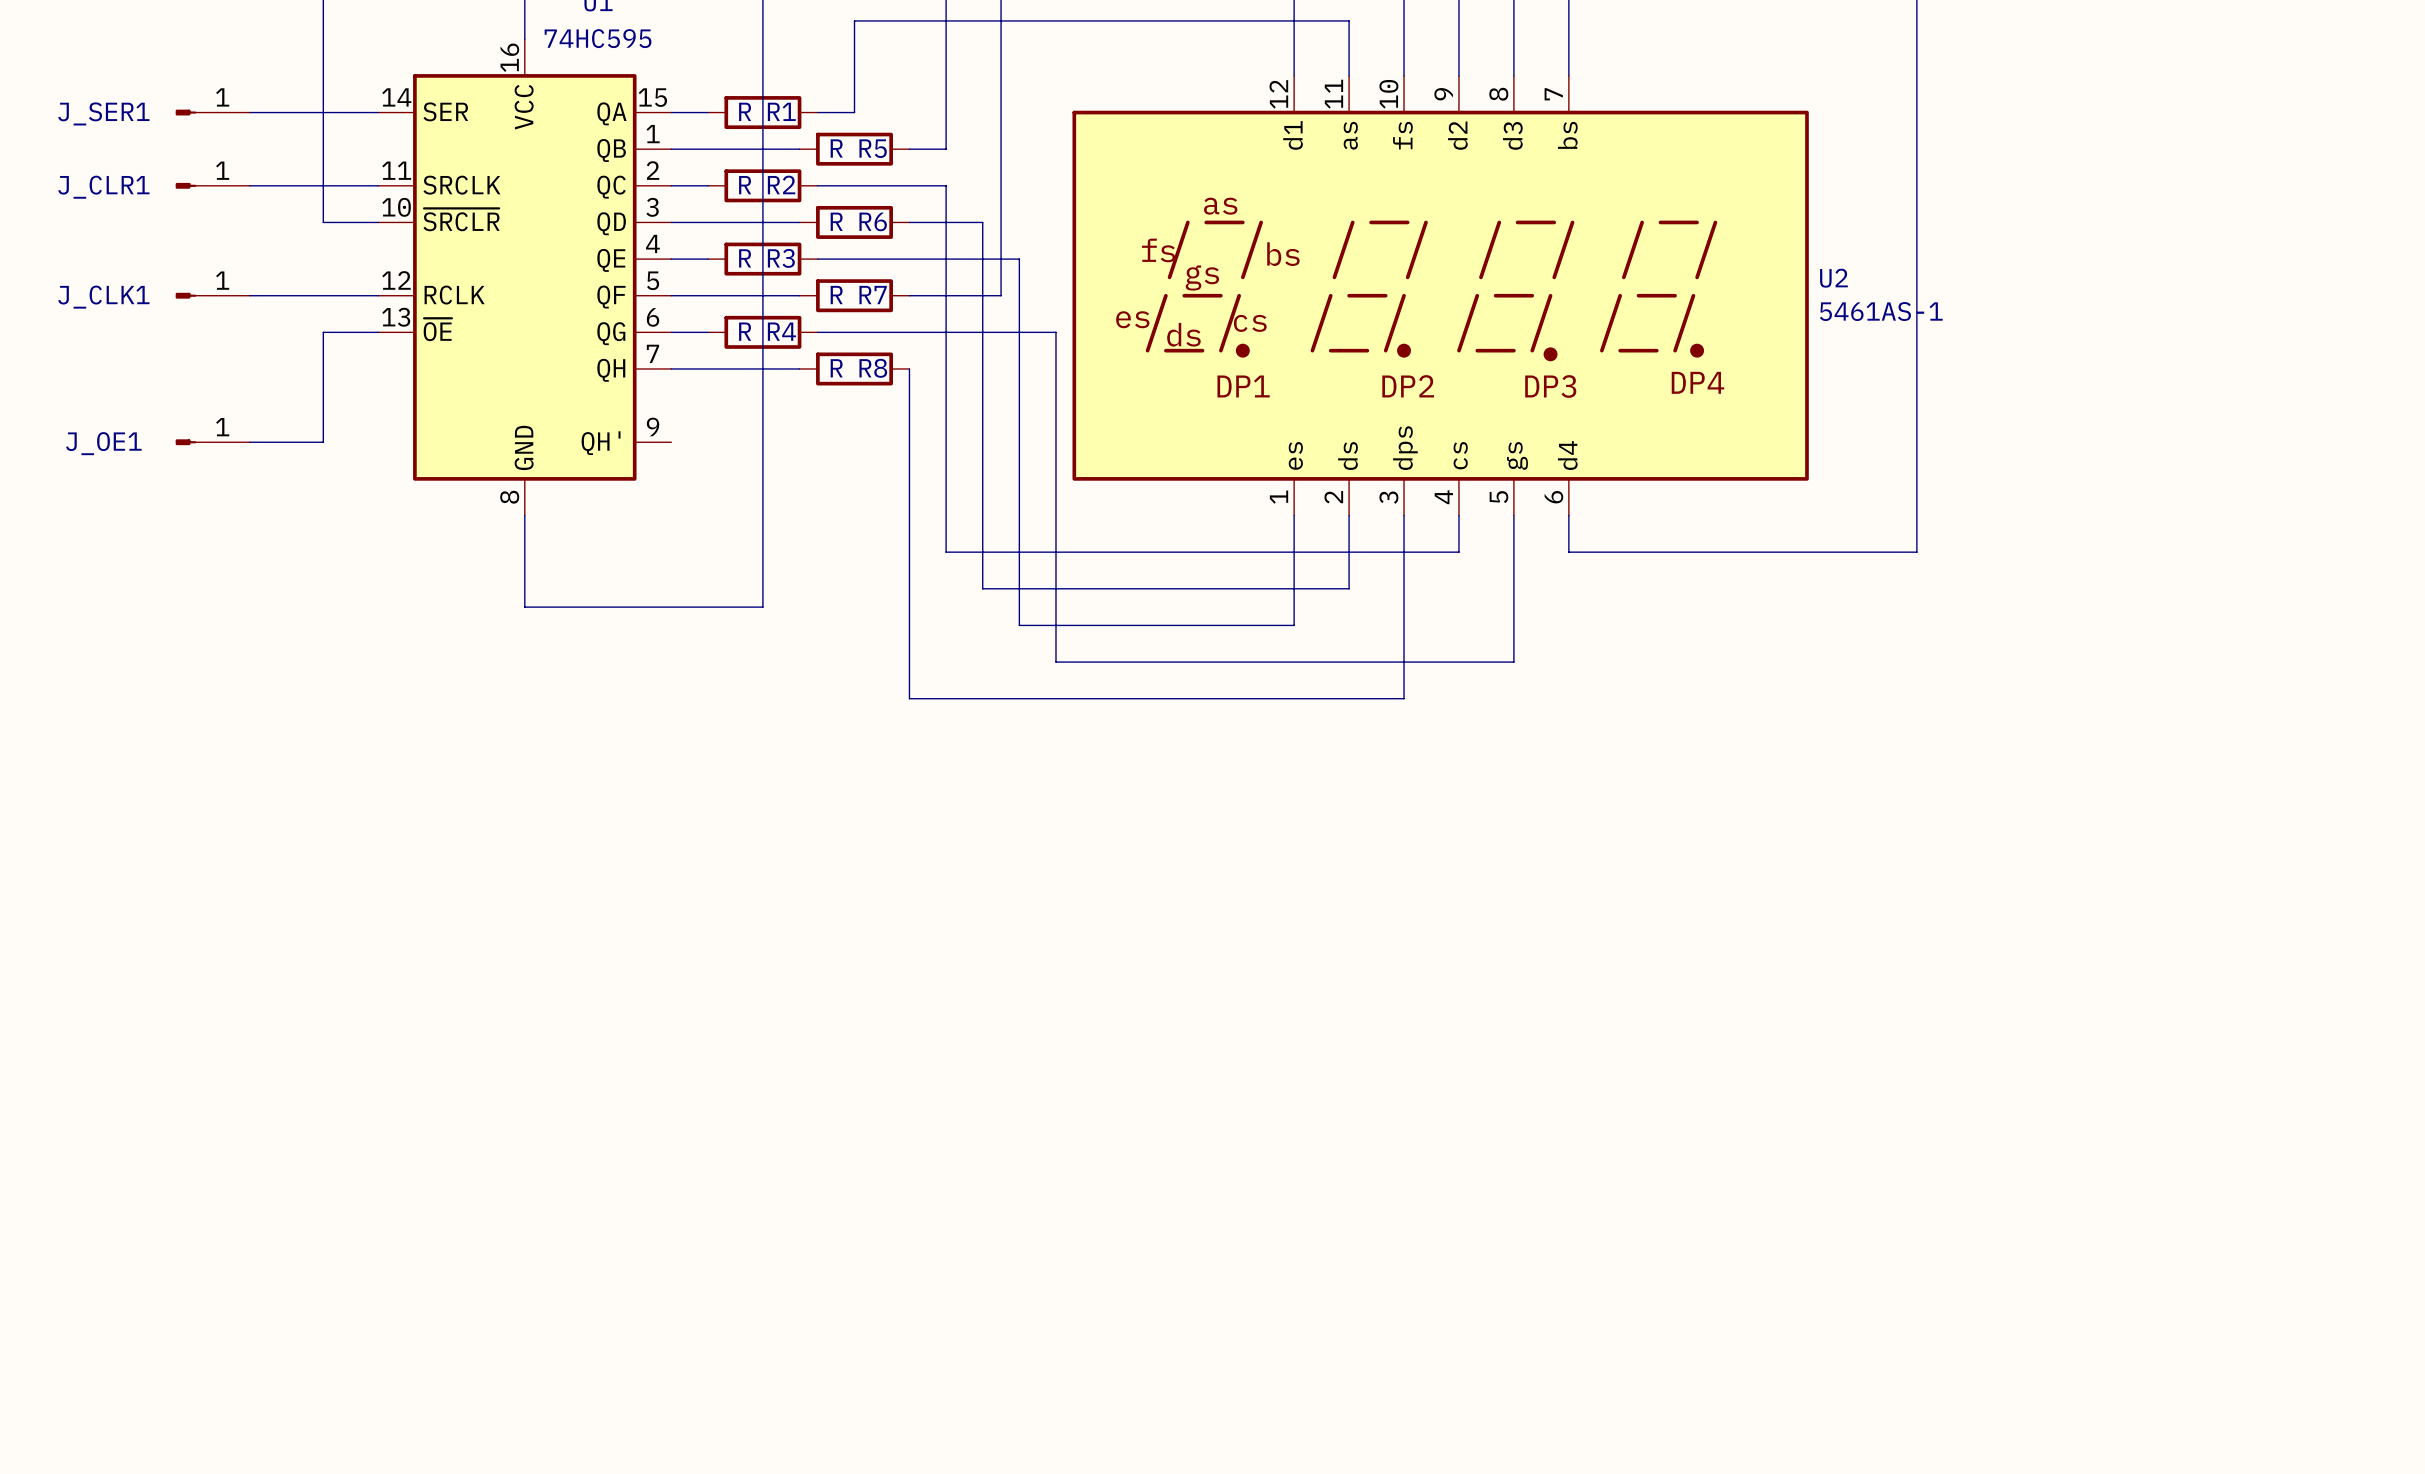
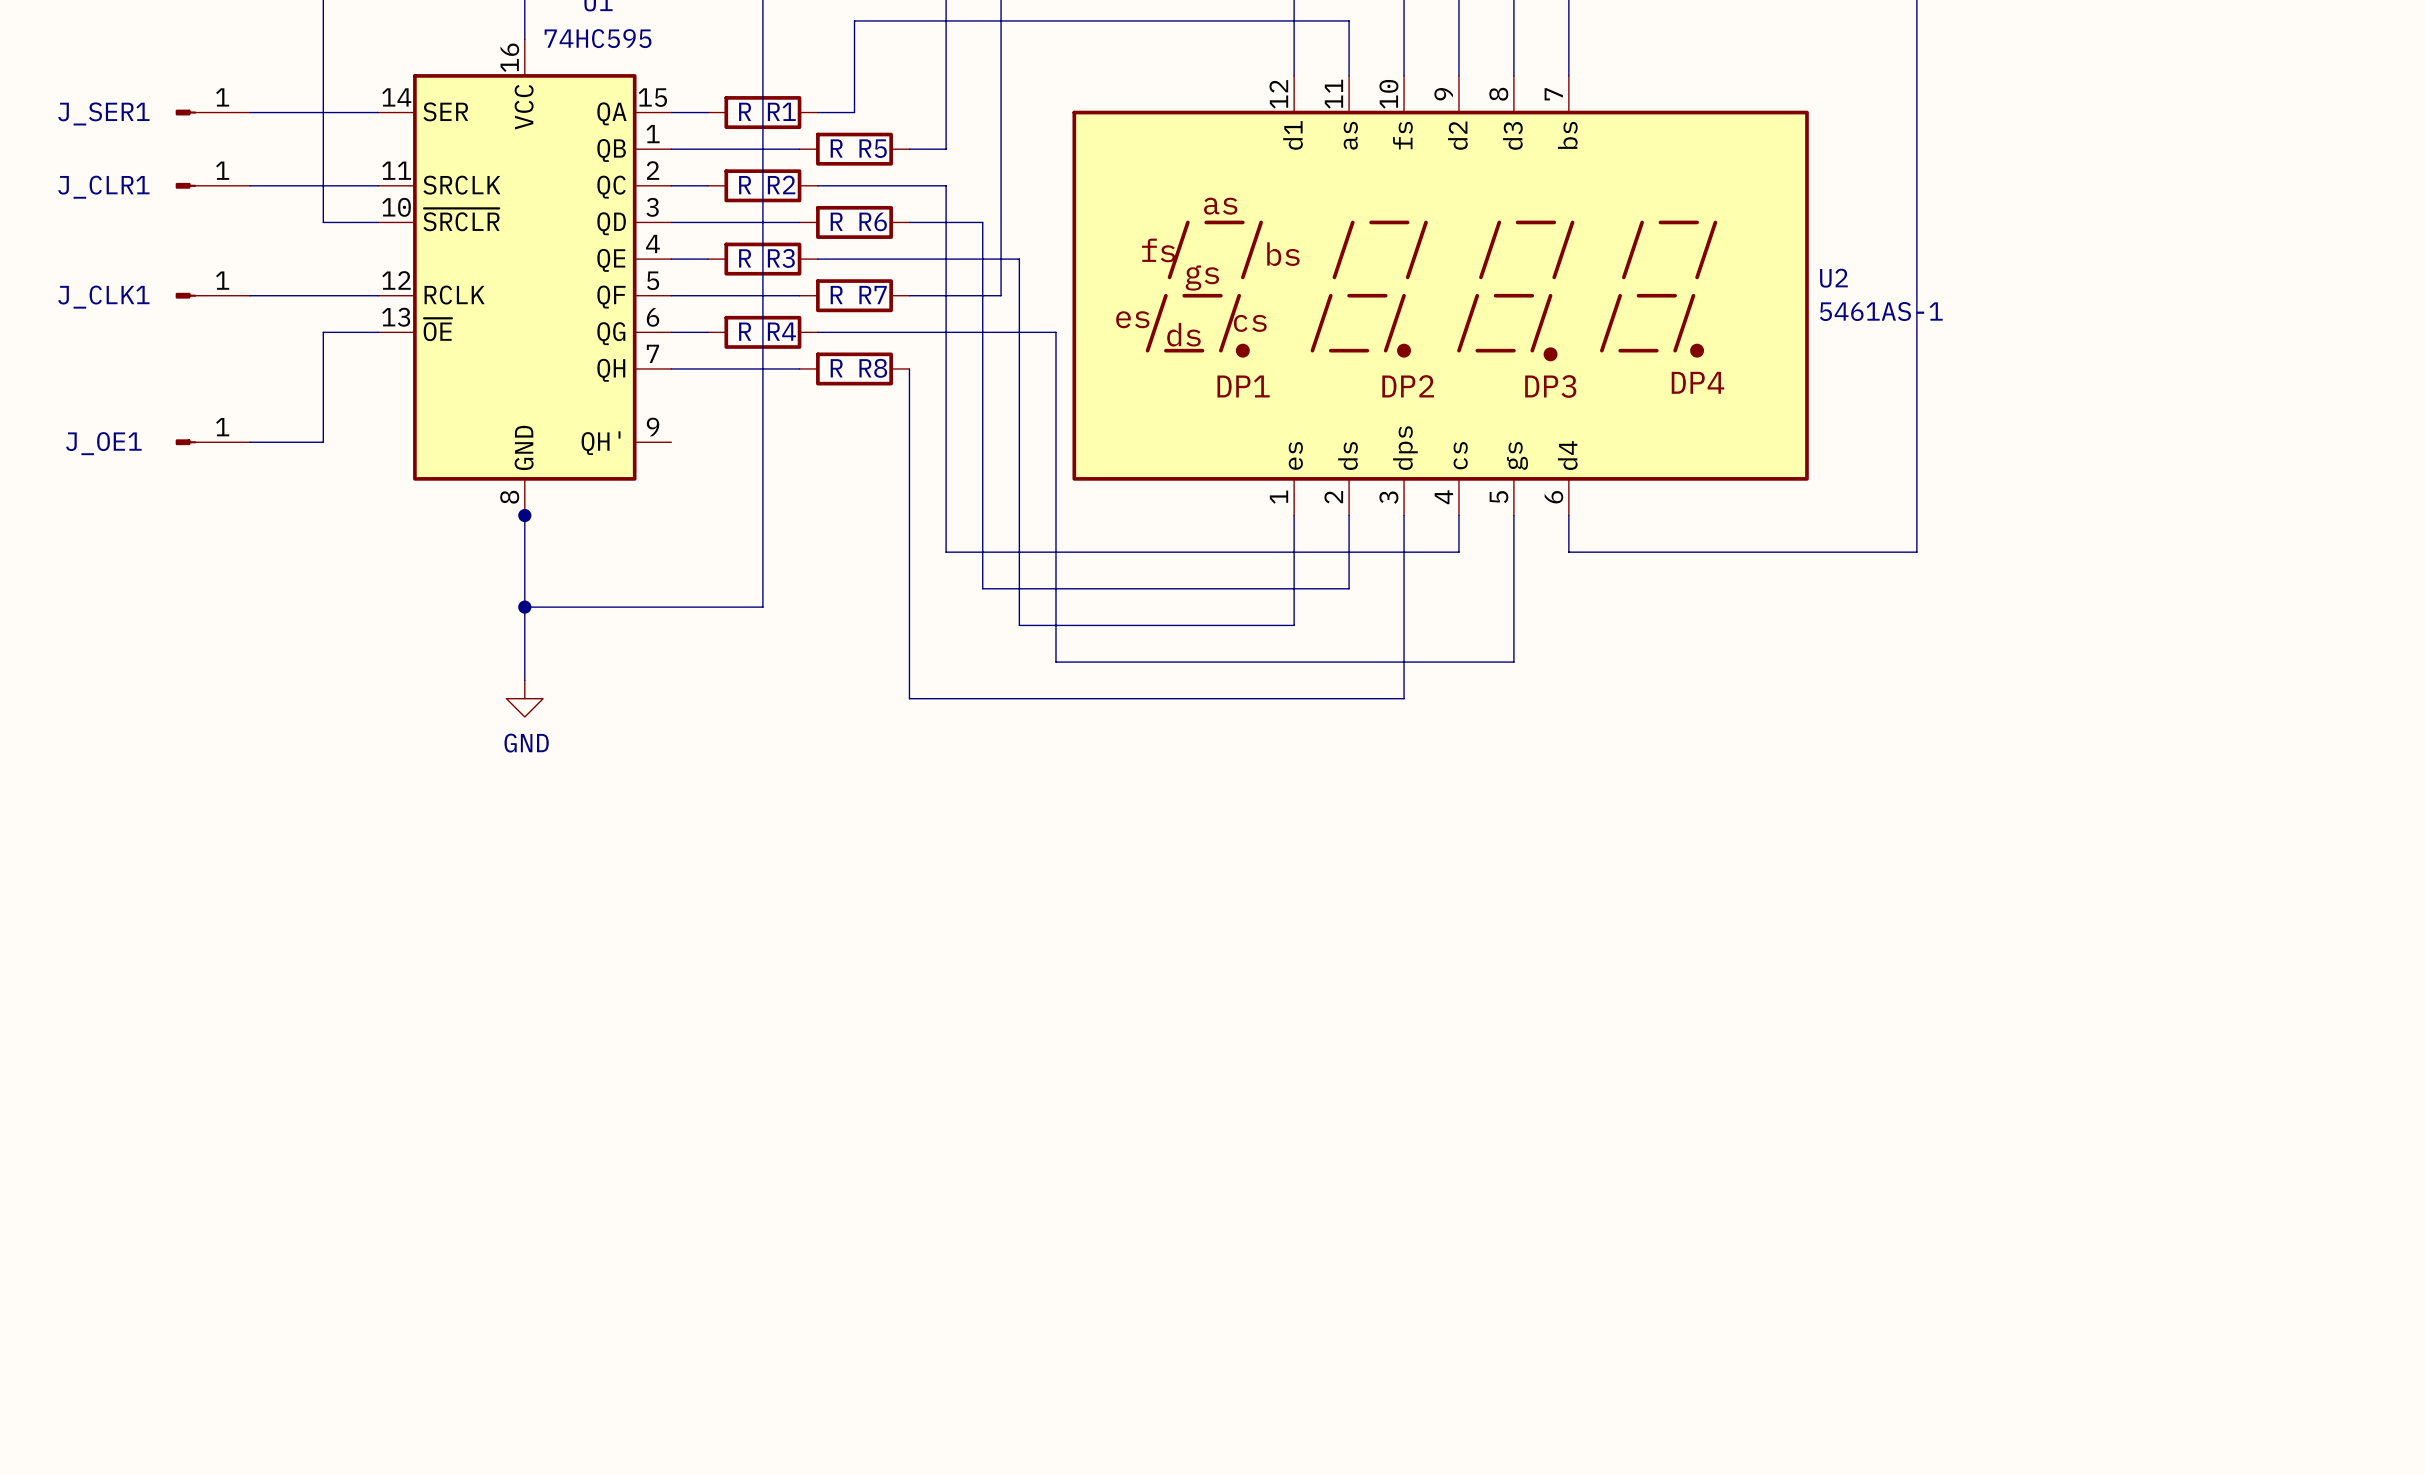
junction: none -> (524, 515)
wire: none -> (524, 607) (524, 680)
junction: none -> (524, 607)
power symbol: none -> GND (524, 698)

